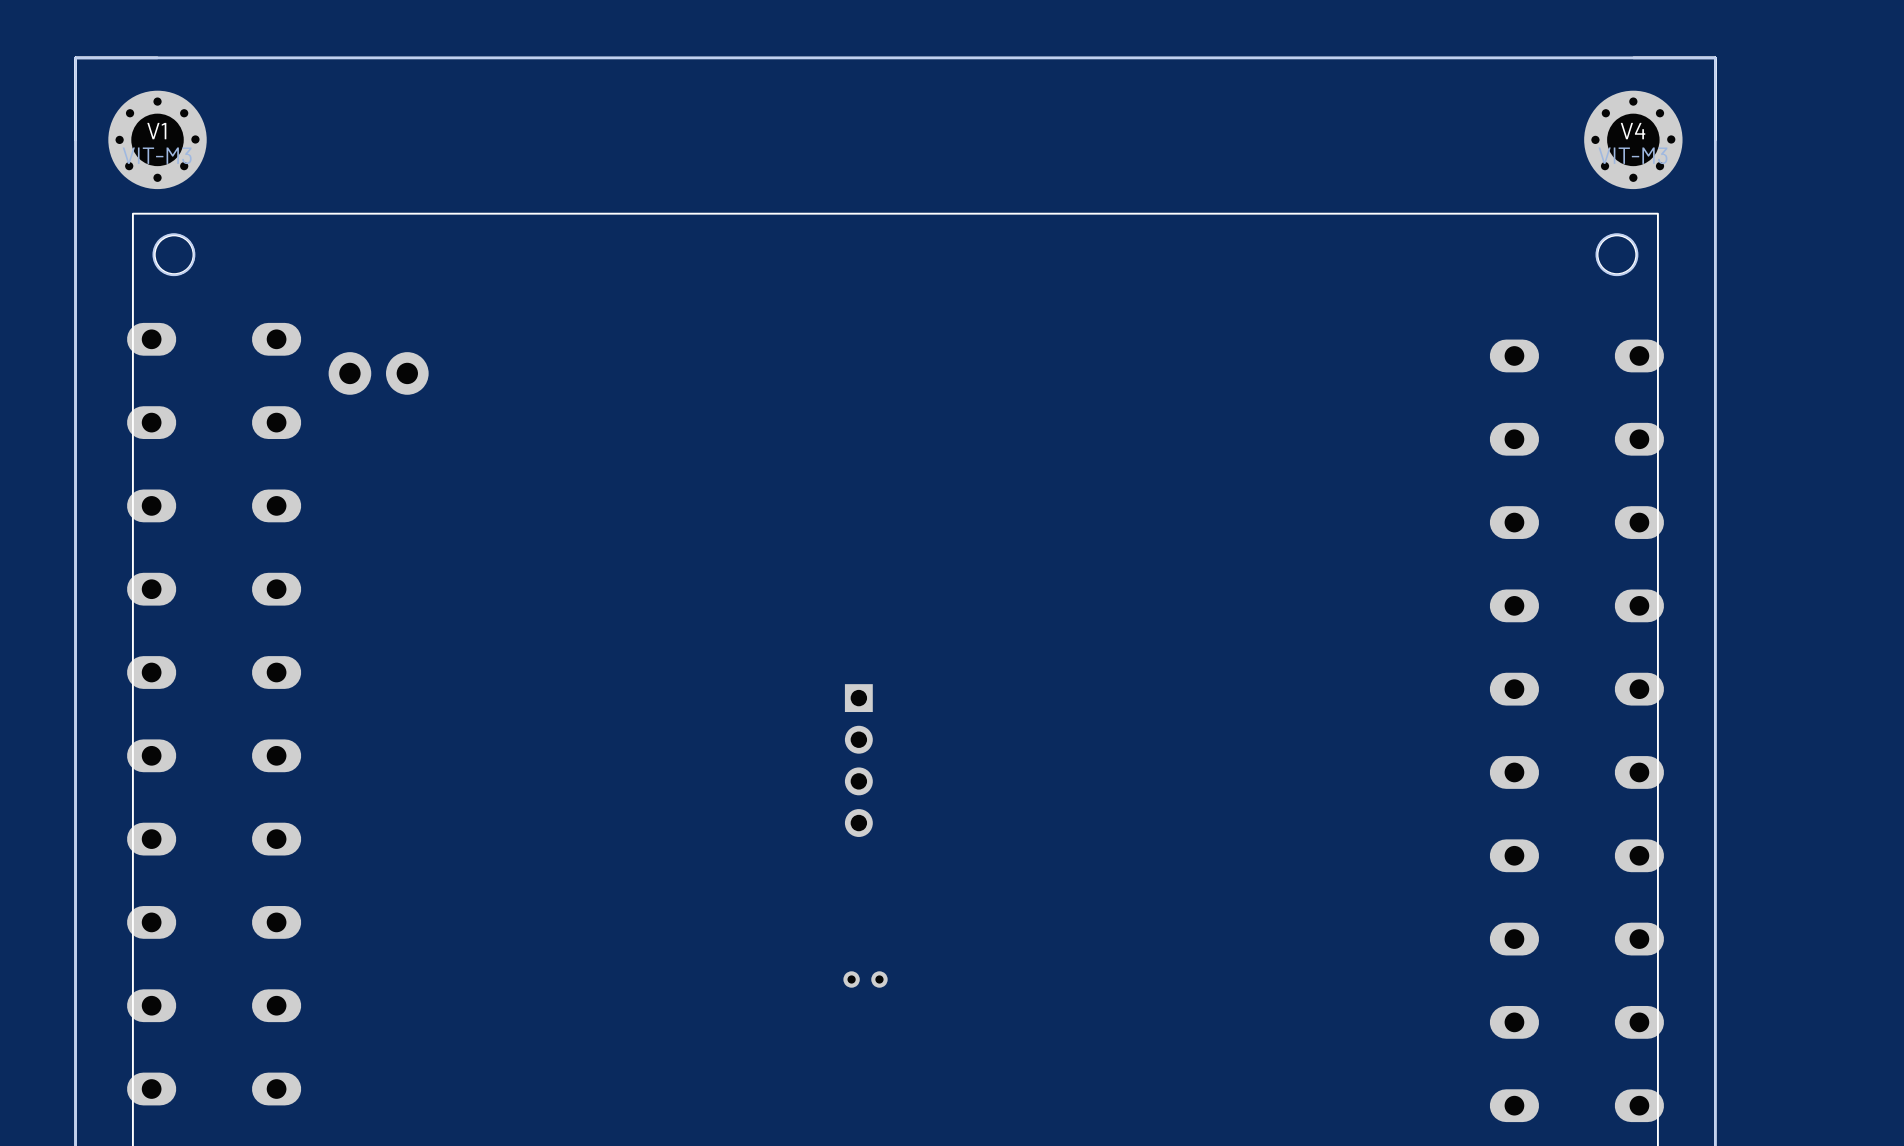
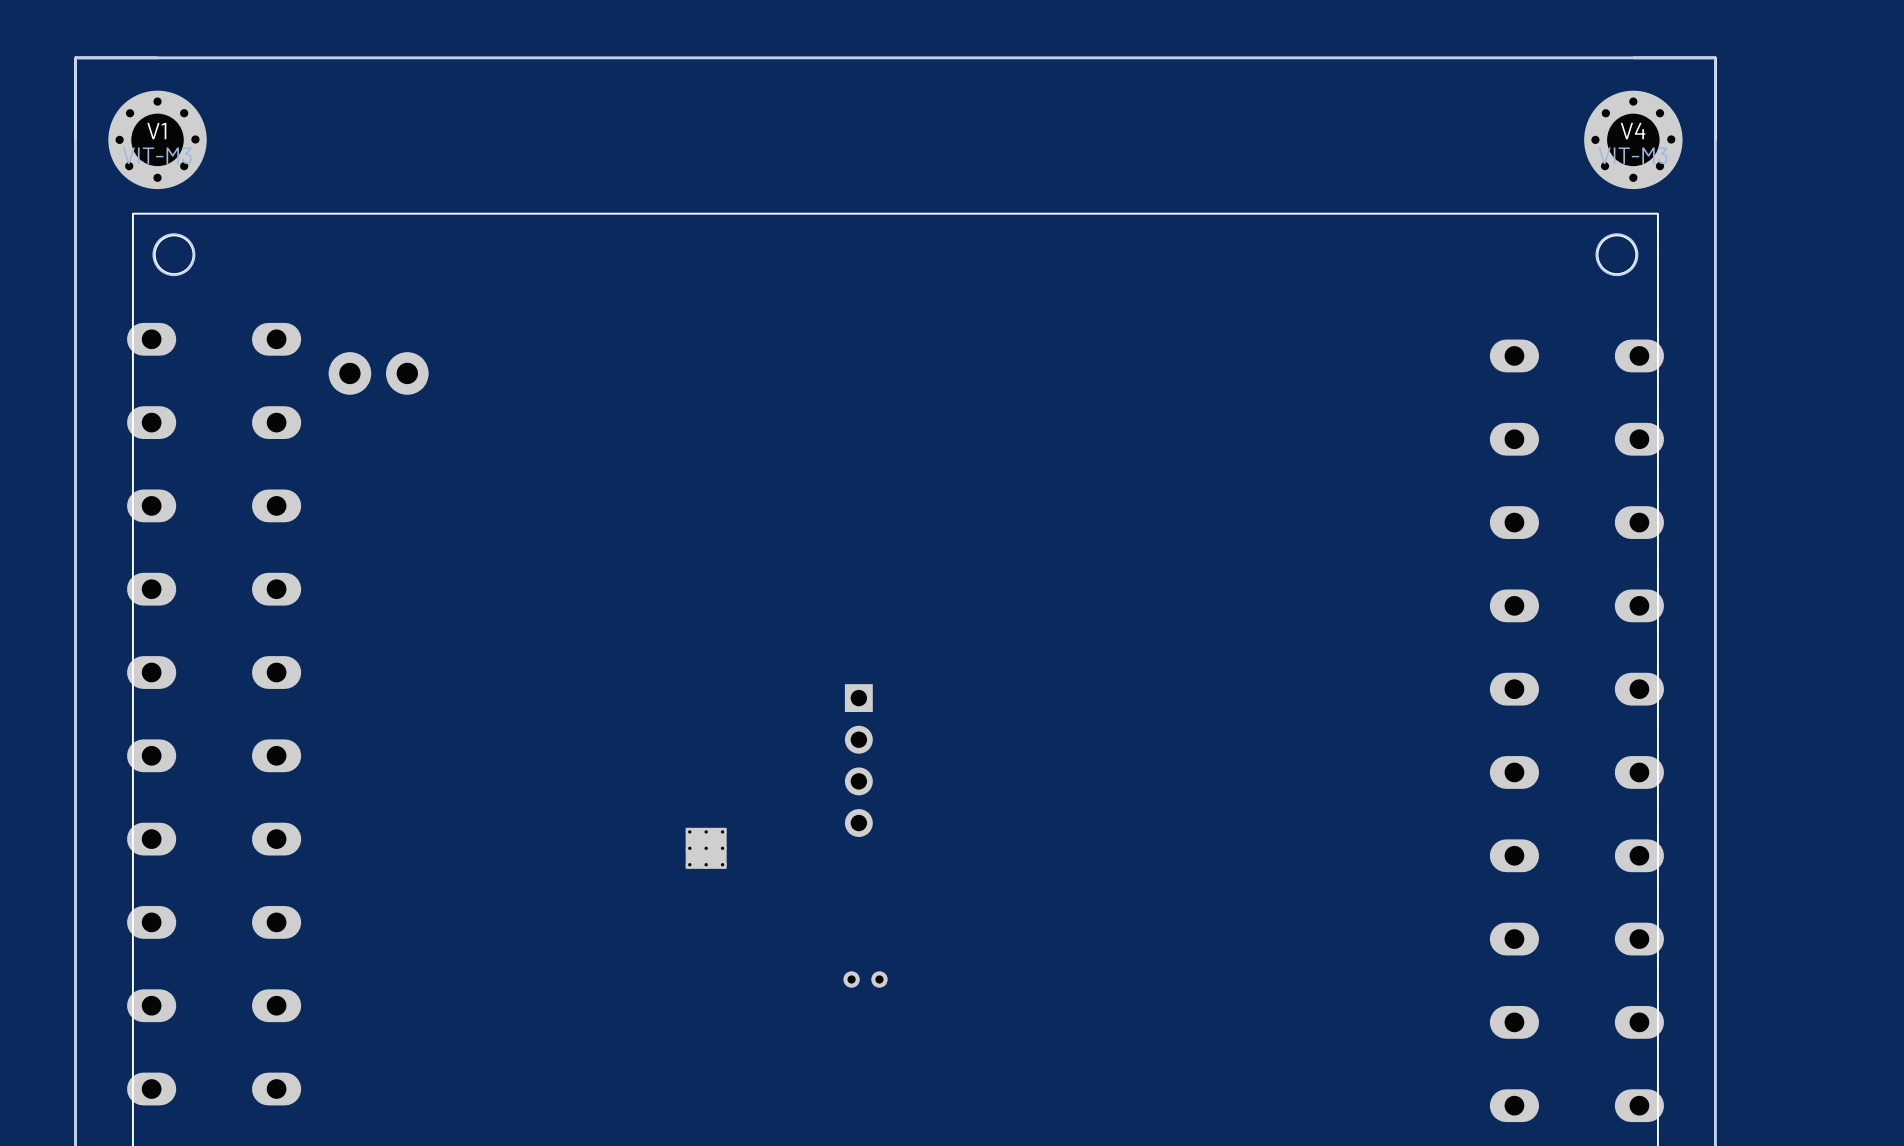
part: none -> (706, 848)

